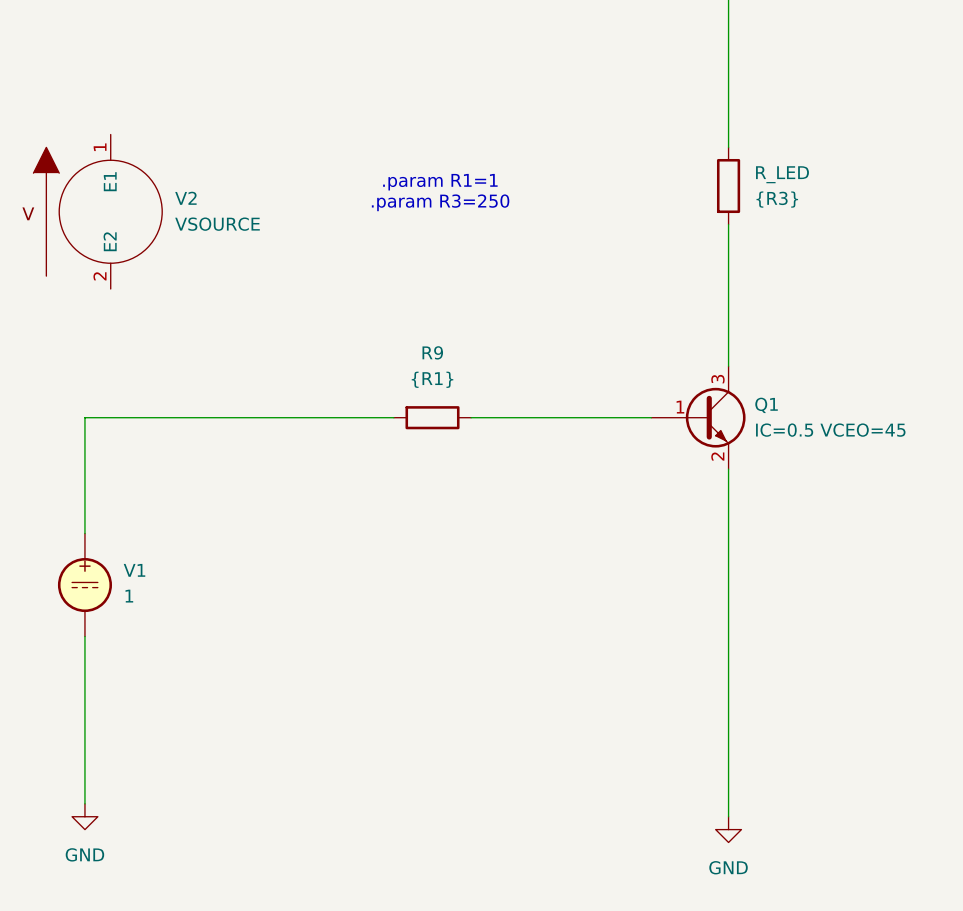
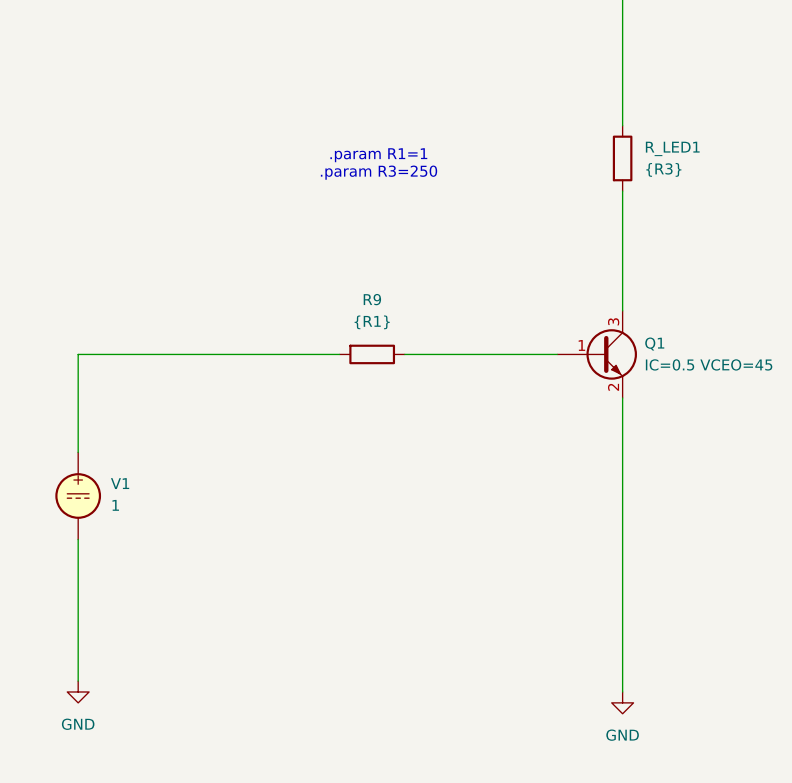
R_LED name: R_LED (782, 174) -> R_LED1 (672, 148)
V2: VSOURCE (97, 211) -> none

